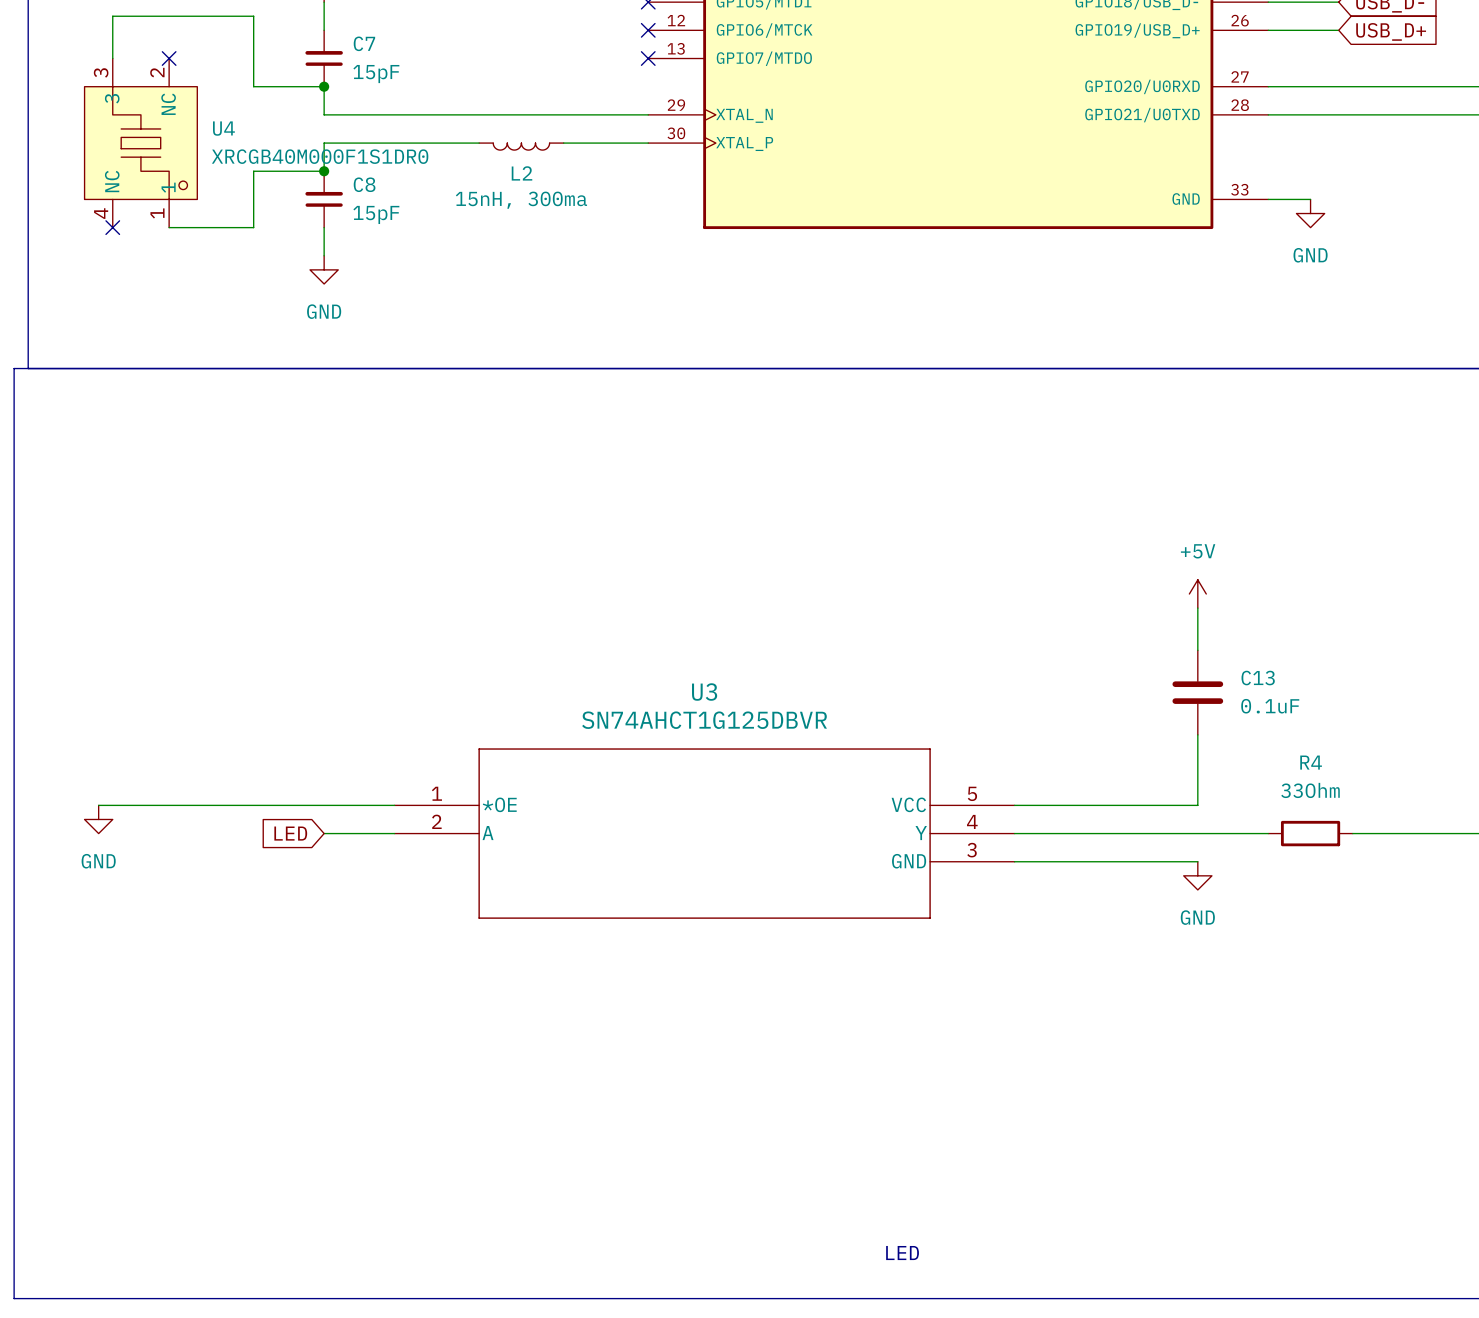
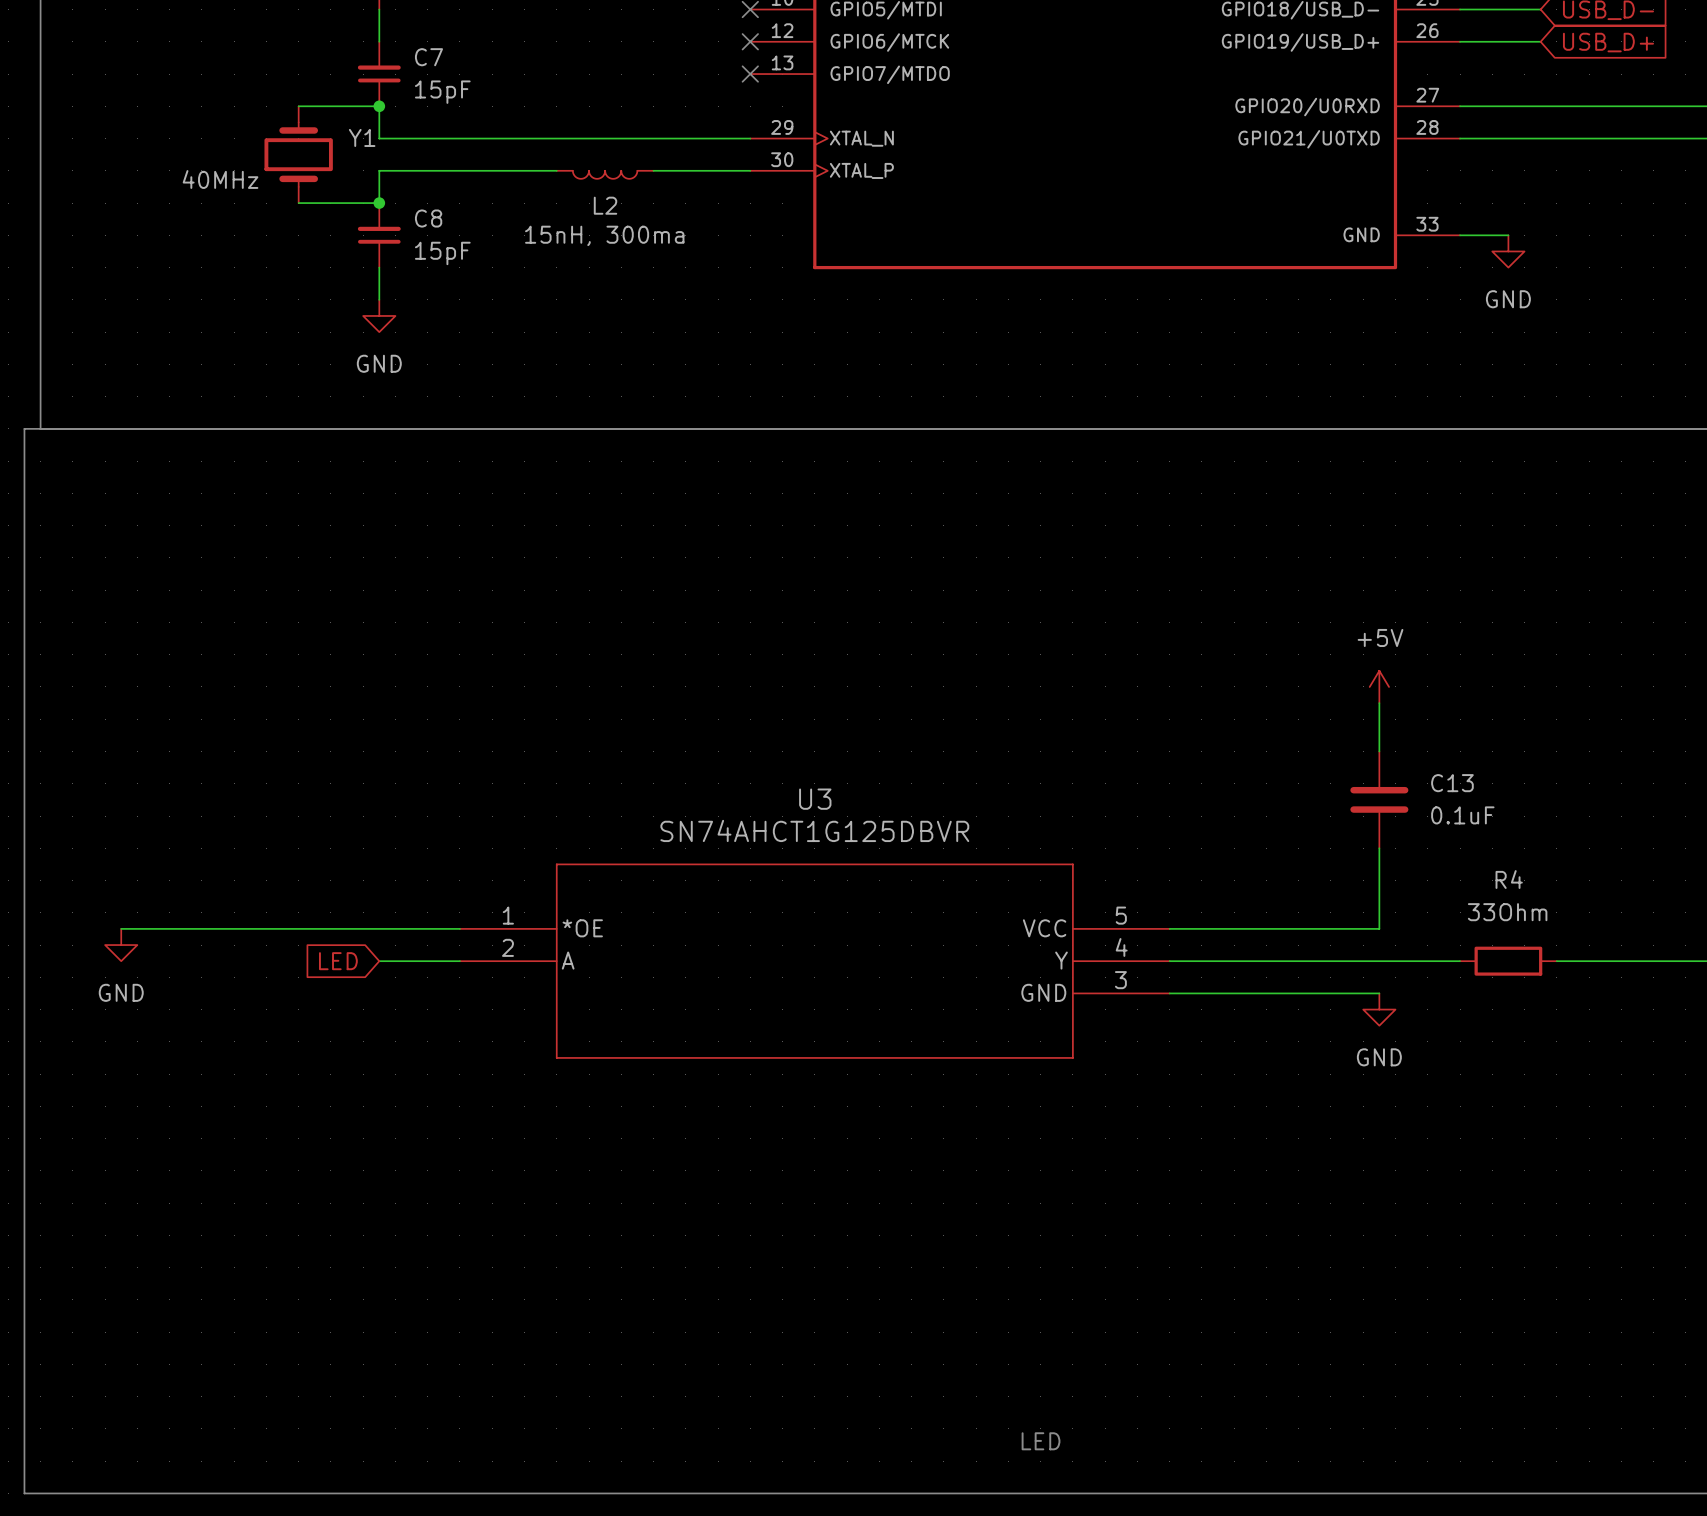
wire: (112, 58) (112, 16) (253, 16) (253, 86) -> none
no-connect mark: (169, 58) -> none
Y1: none -> 40MHz (298, 154)
U4: XRCGB40M000F1S1DR0 (140, 143) -> none
wire: (253, 171) (253, 227) (169, 227) -> none
no-connect mark: (112, 227) -> none

